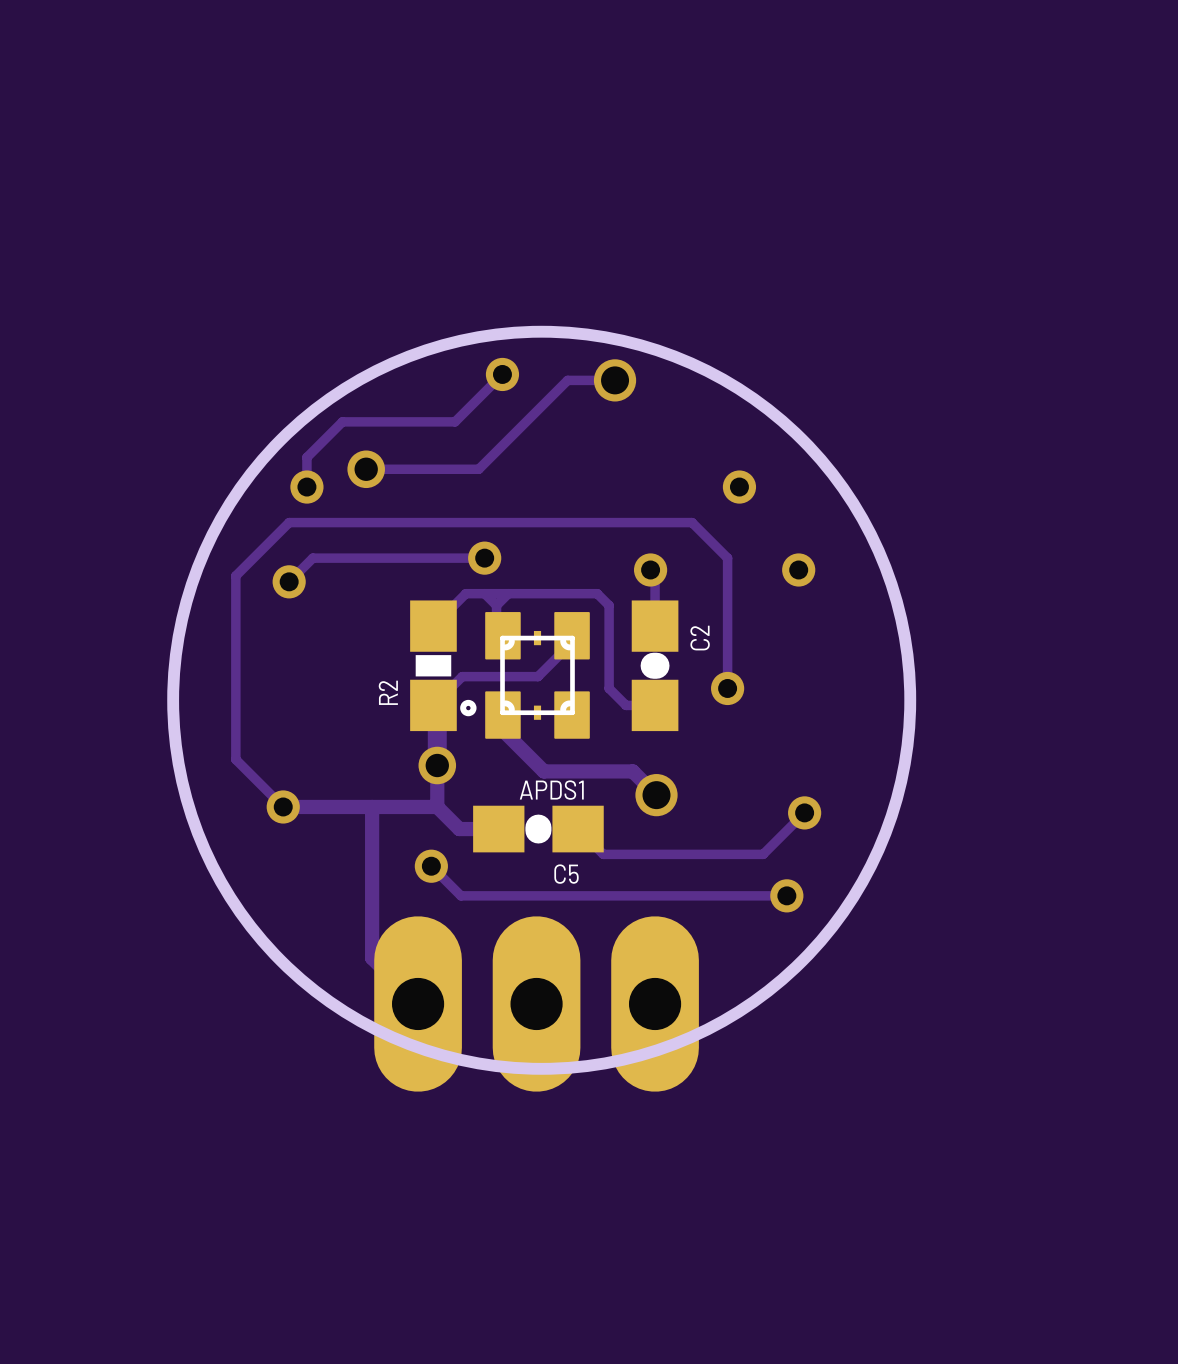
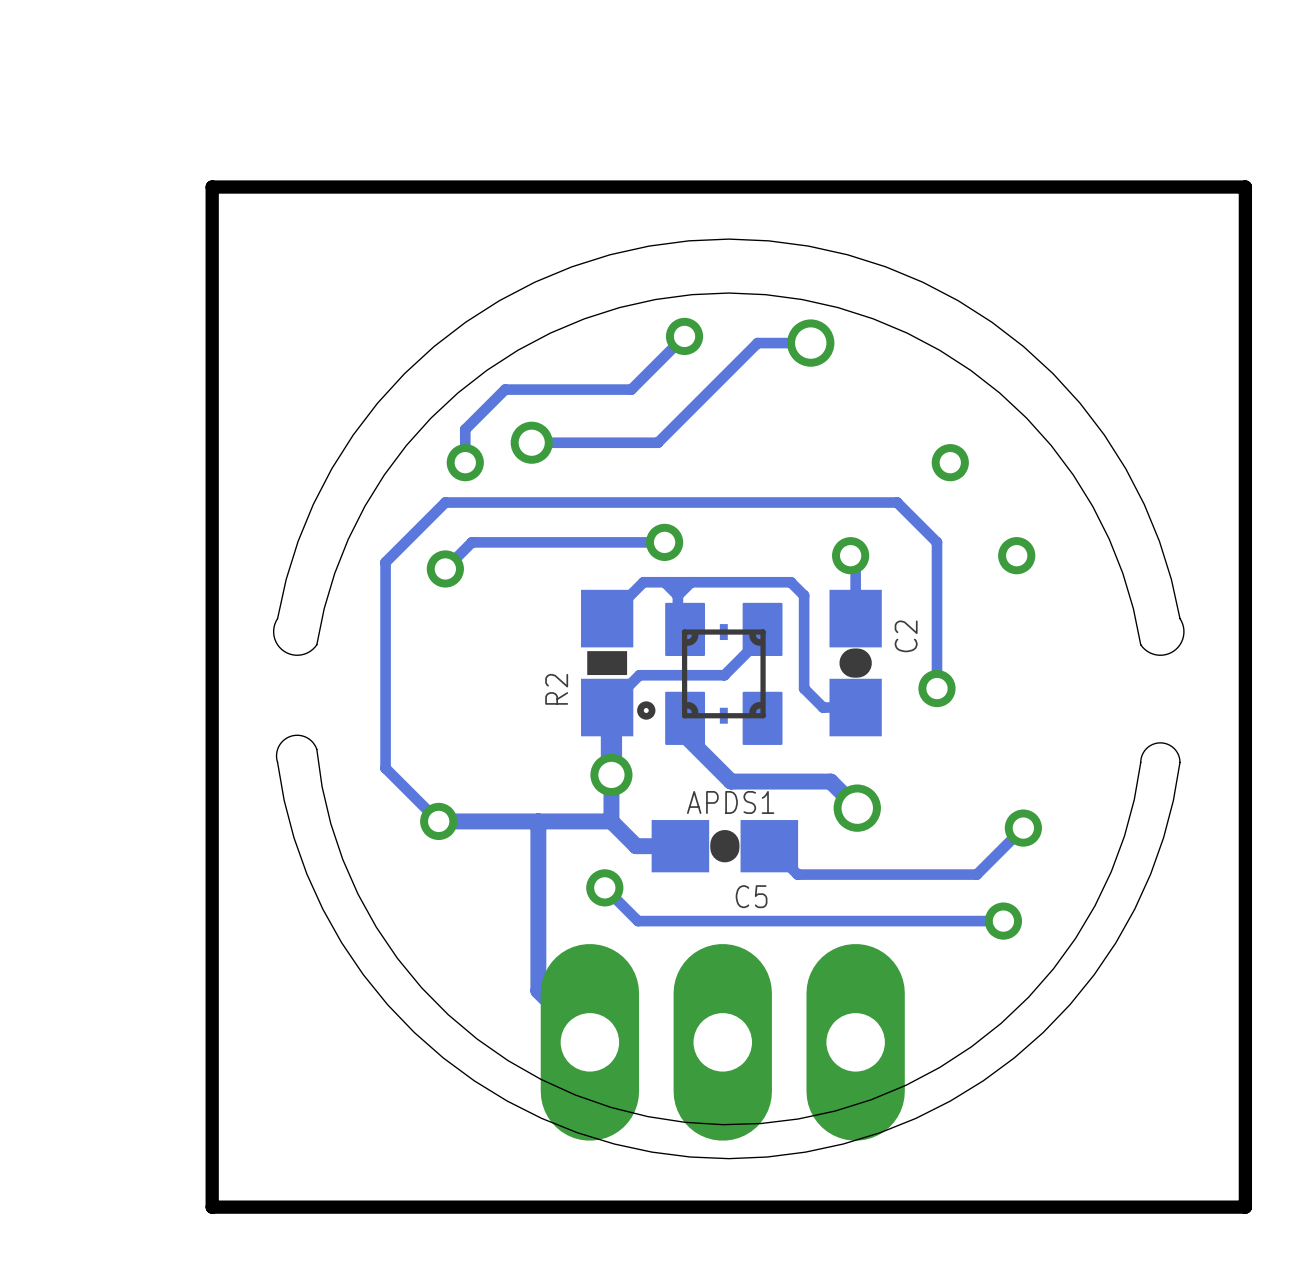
board edge: none -> (1245, 187) (1245, 1207) (212, 1207) (212, 187) (1245, 187)
round board edge: [167, 325, 917, 1075] -> none
board edge: none -> (1179, 618) (1171, 579) (1159, 541) (1144, 504) (1125, 468) (1104, 435) (1080, 403) (1053, 373) (1023, 346) (991, 322) (958, 300) (922, 282) (885, 266) (847, 254) (808, 246) (768, 240) (728, 239) (688, 240) (649, 246) (610, 254) (571, 266) (534, 282) (499, 300) (465, 322) (433, 346) (404, 373) (377, 403) (353, 435) (331, 468) (313, 504) (298, 541) (286, 579) (273, 633) (277, 644) (289, 654) (304, 654) (314, 647) (334, 573) (348, 539) (364, 506) (384, 474) (406, 445) (431, 418) (457, 392) (486, 370) (517, 350) (550, 333) (584, 318) (619, 307) (655, 299) (691, 294) (728, 293) (765, 294) (802, 299) (838, 307) (873, 318) (907, 333) (939, 350) (970, 370) (999, 392) (1026, 418) (1051, 445) (1073, 474) (1092, 506) (1109, 539) (1122, 573) (1142, 647) (1149, 652) (1158, 655) (1167, 654) (1175, 649) (1181, 642) (1183, 633) (1179, 618)
board edge: none -> (316, 749) (308, 738) (295, 735) (283, 740) (276, 751) (284, 800) (293, 837) (306, 874) (322, 909) (341, 942) (363, 974) (387, 1004) (414, 1032) (443, 1057) (474, 1080) (507, 1101) (541, 1118) (577, 1132) (614, 1144) (652, 1152) (690, 1157) (728, 1158) (767, 1157) (805, 1152) (843, 1144) (880, 1132) (915, 1118) (950, 1101) (983, 1080) (1014, 1057) (1043, 1032) (1069, 1004) (1094, 974) (1115, 942) (1134, 909) (1150, 874) (1163, 837) (1173, 800) (1179, 762) (1177, 752) (1167, 744) (1155, 743) (1144, 750) (1141, 757) (1134, 799) (1124, 836) (1111, 871) (1094, 905) (1075, 938) (1053, 968) (1028, 997) (1001, 1023) (971, 1046) (939, 1067) (906, 1085) (871, 1099) (835, 1111) (798, 1118) (760, 1123) (722, 1124) (685, 1122) (647, 1116) (611, 1107) (575, 1095) (540, 1079) (508, 1060) (477, 1039) (448, 1014) (421, 987) (397, 958) (376, 927) (358, 894) (342, 859) (330, 823) (322, 786) (316, 749)

